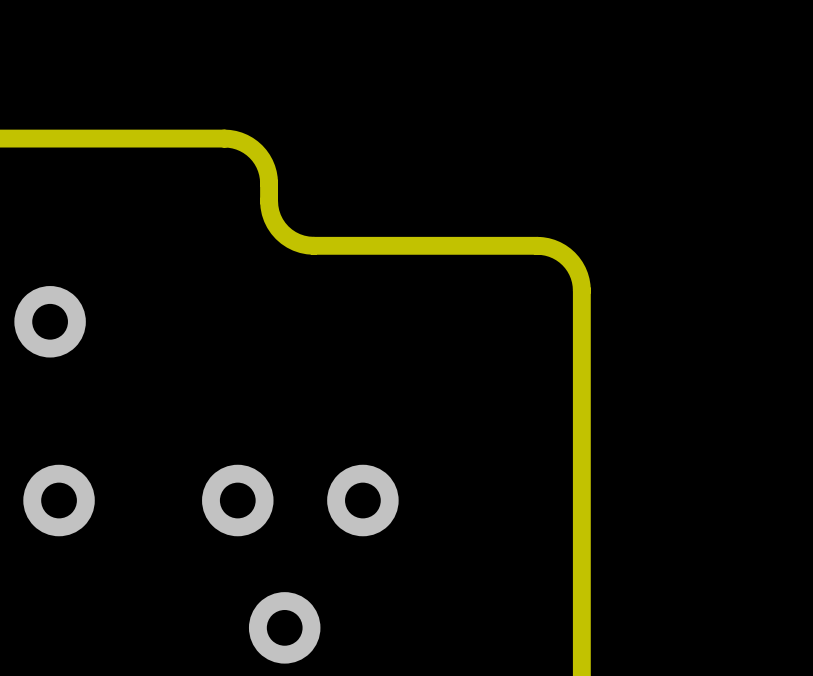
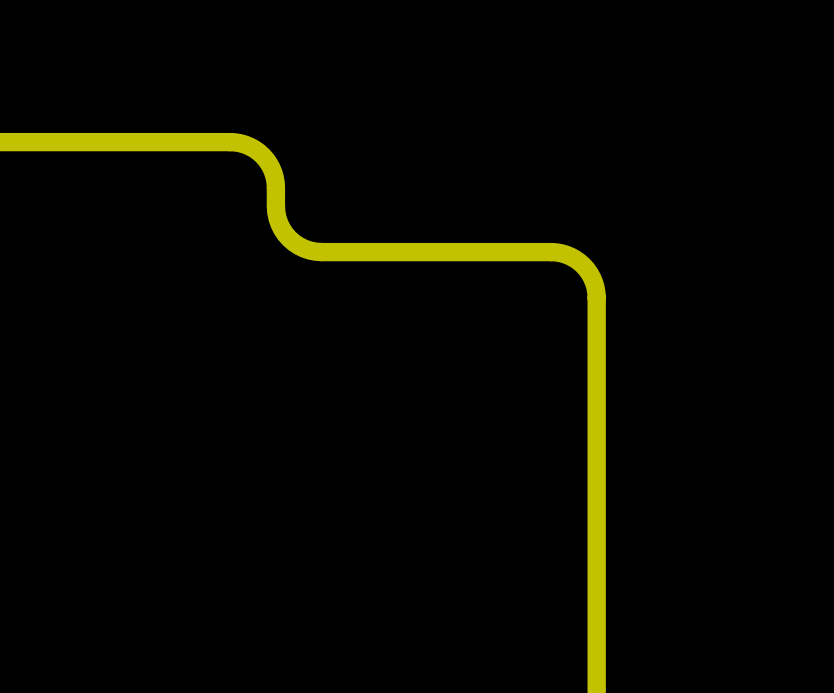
via: (50, 321) -> none
via: (59, 500) -> none
via: (237, 500) -> none
via: (362, 500) -> none
via: (284, 627) -> none

